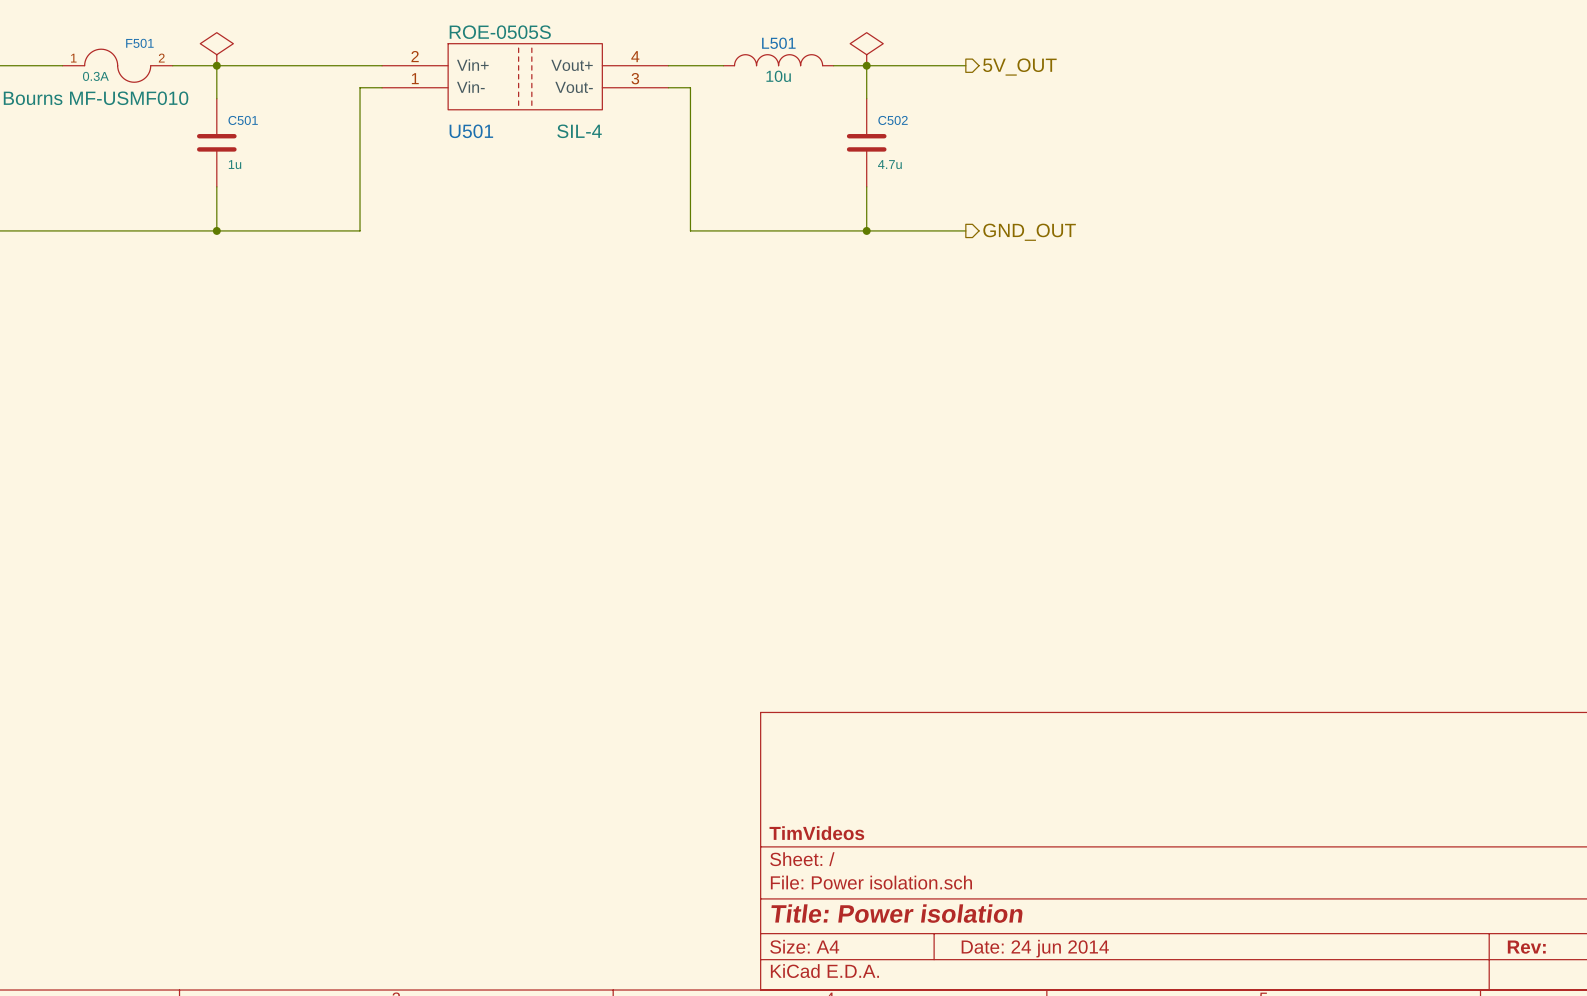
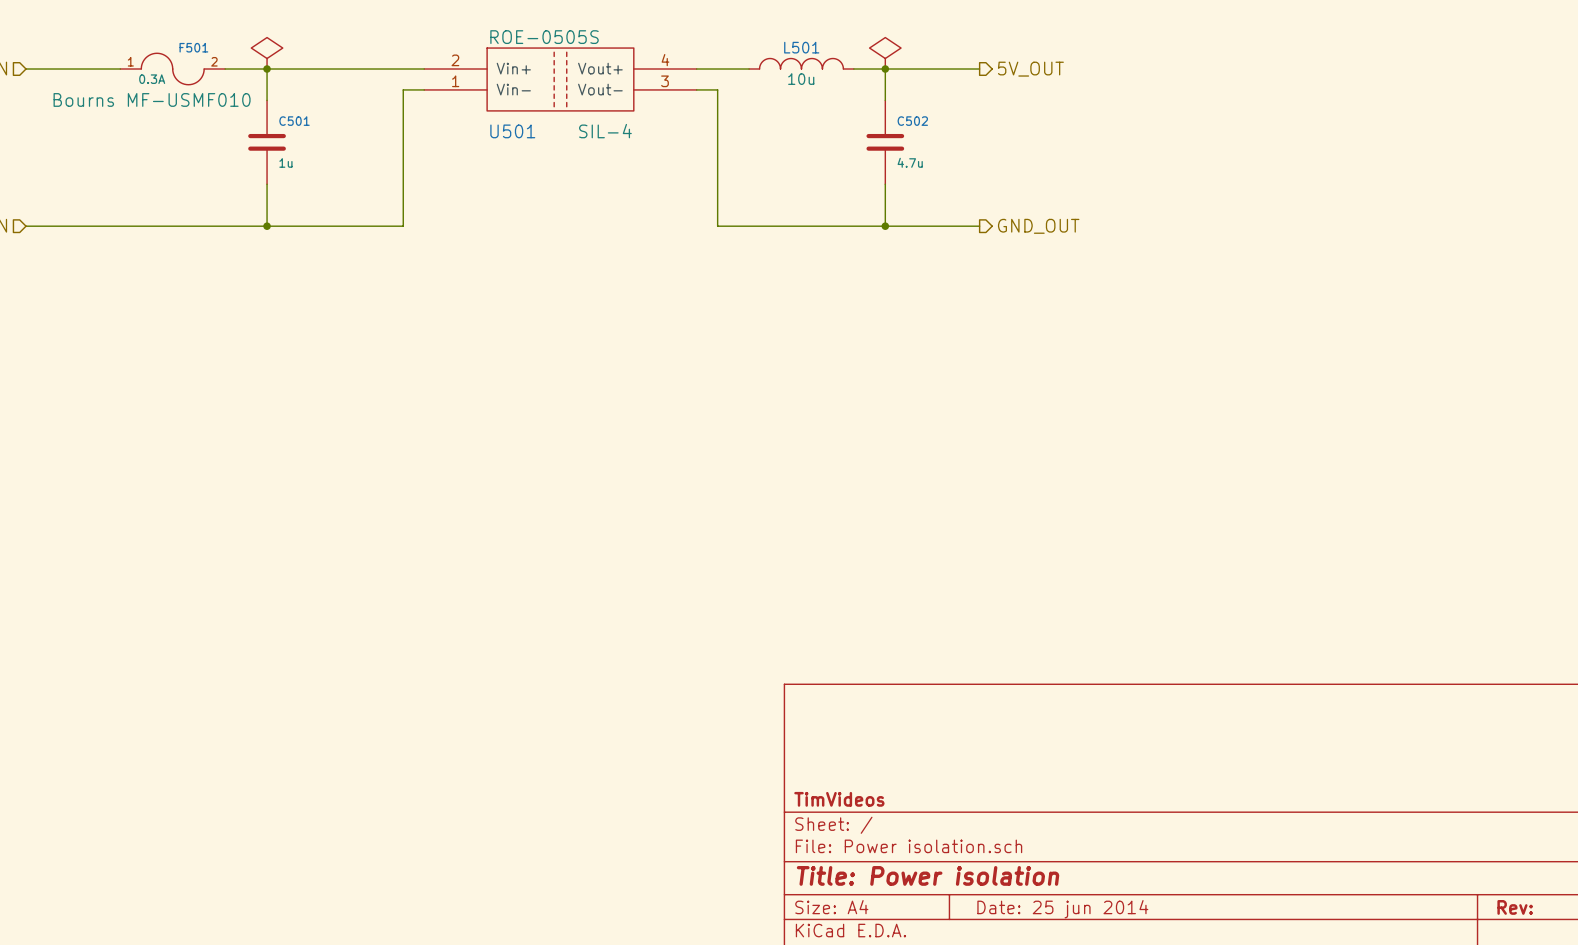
title block: Date: 24 jun 2014 (1035, 948) -> Date: 25 jun 2014 (1062, 909)

